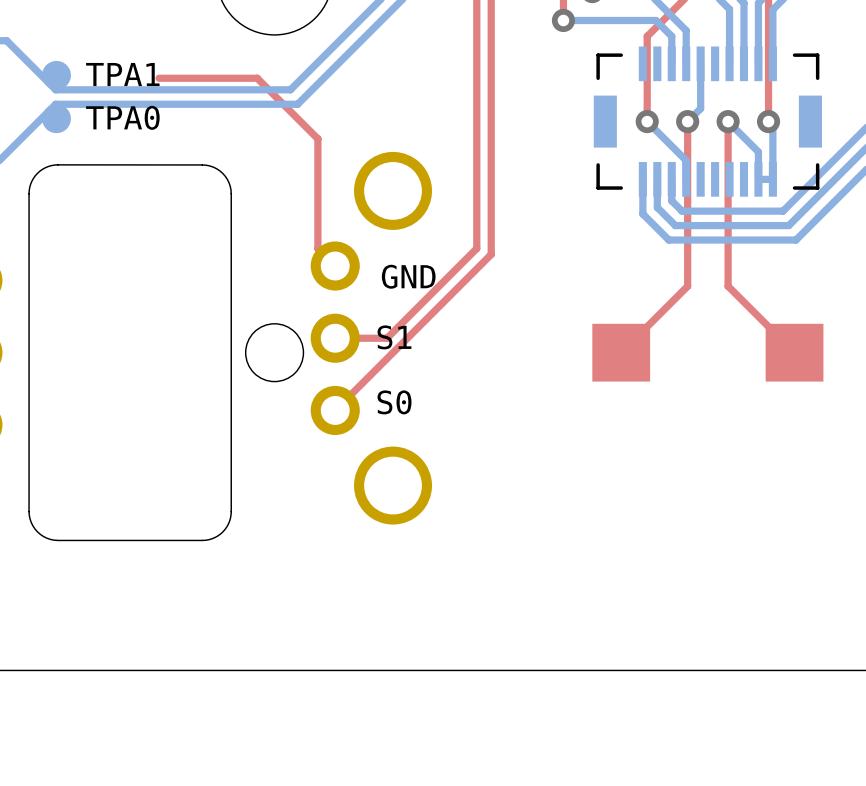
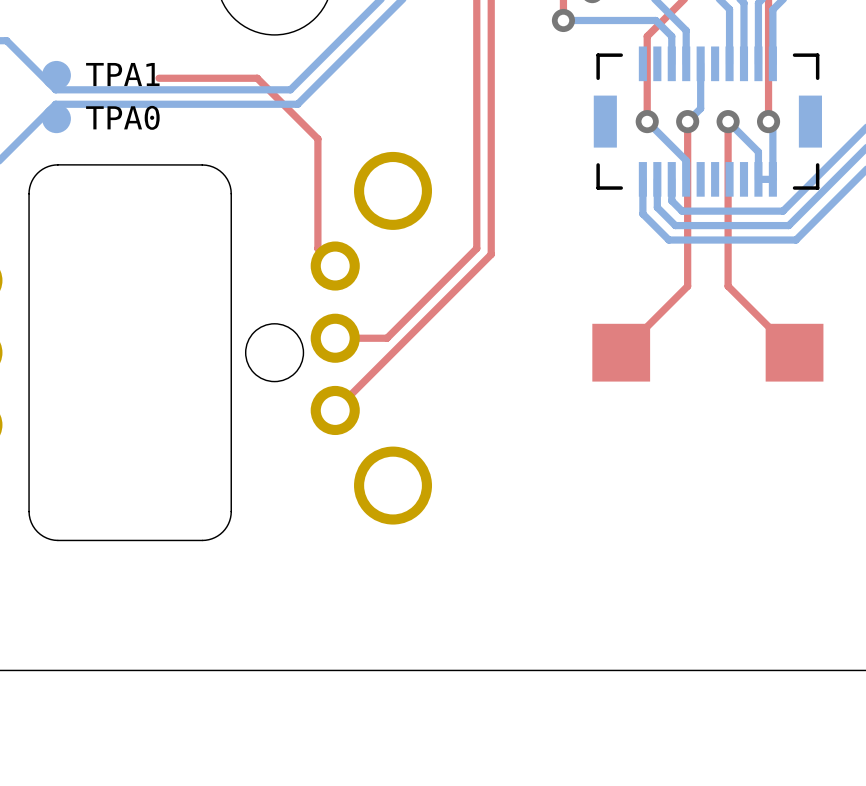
text: GND (408, 276) -> none
text: S1 (394, 337) -> none
text: S0 (394, 402) -> none

